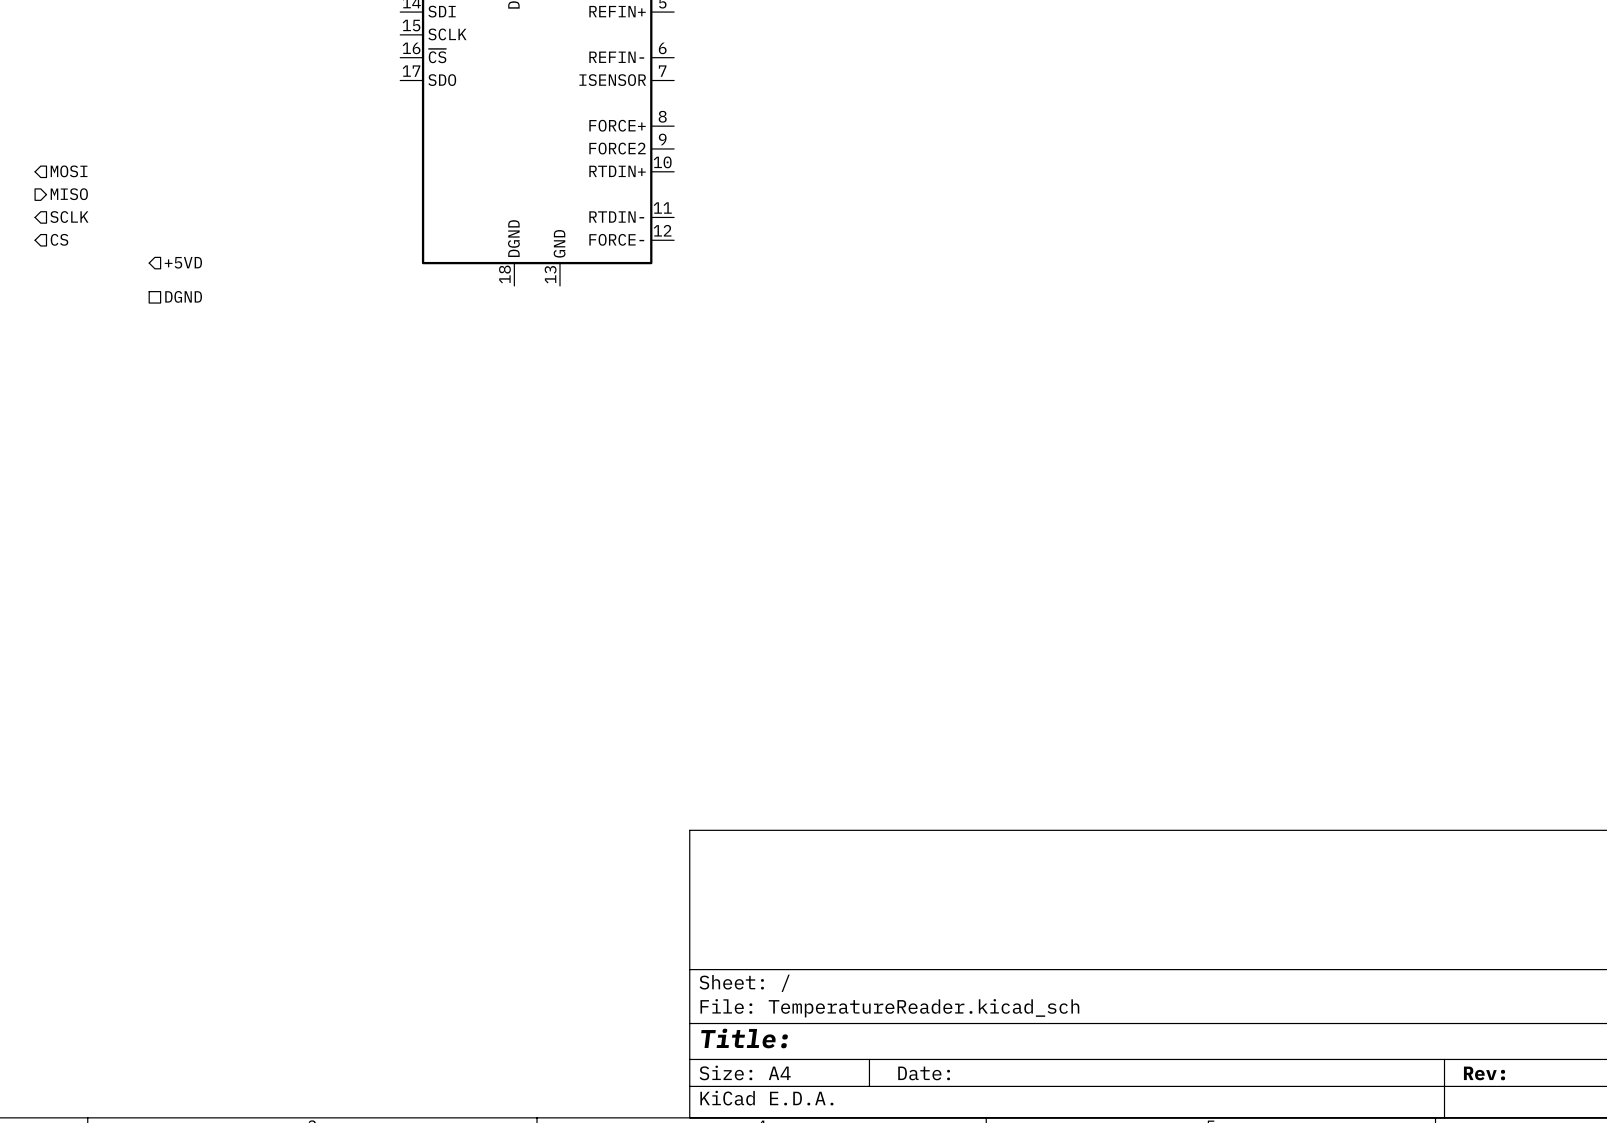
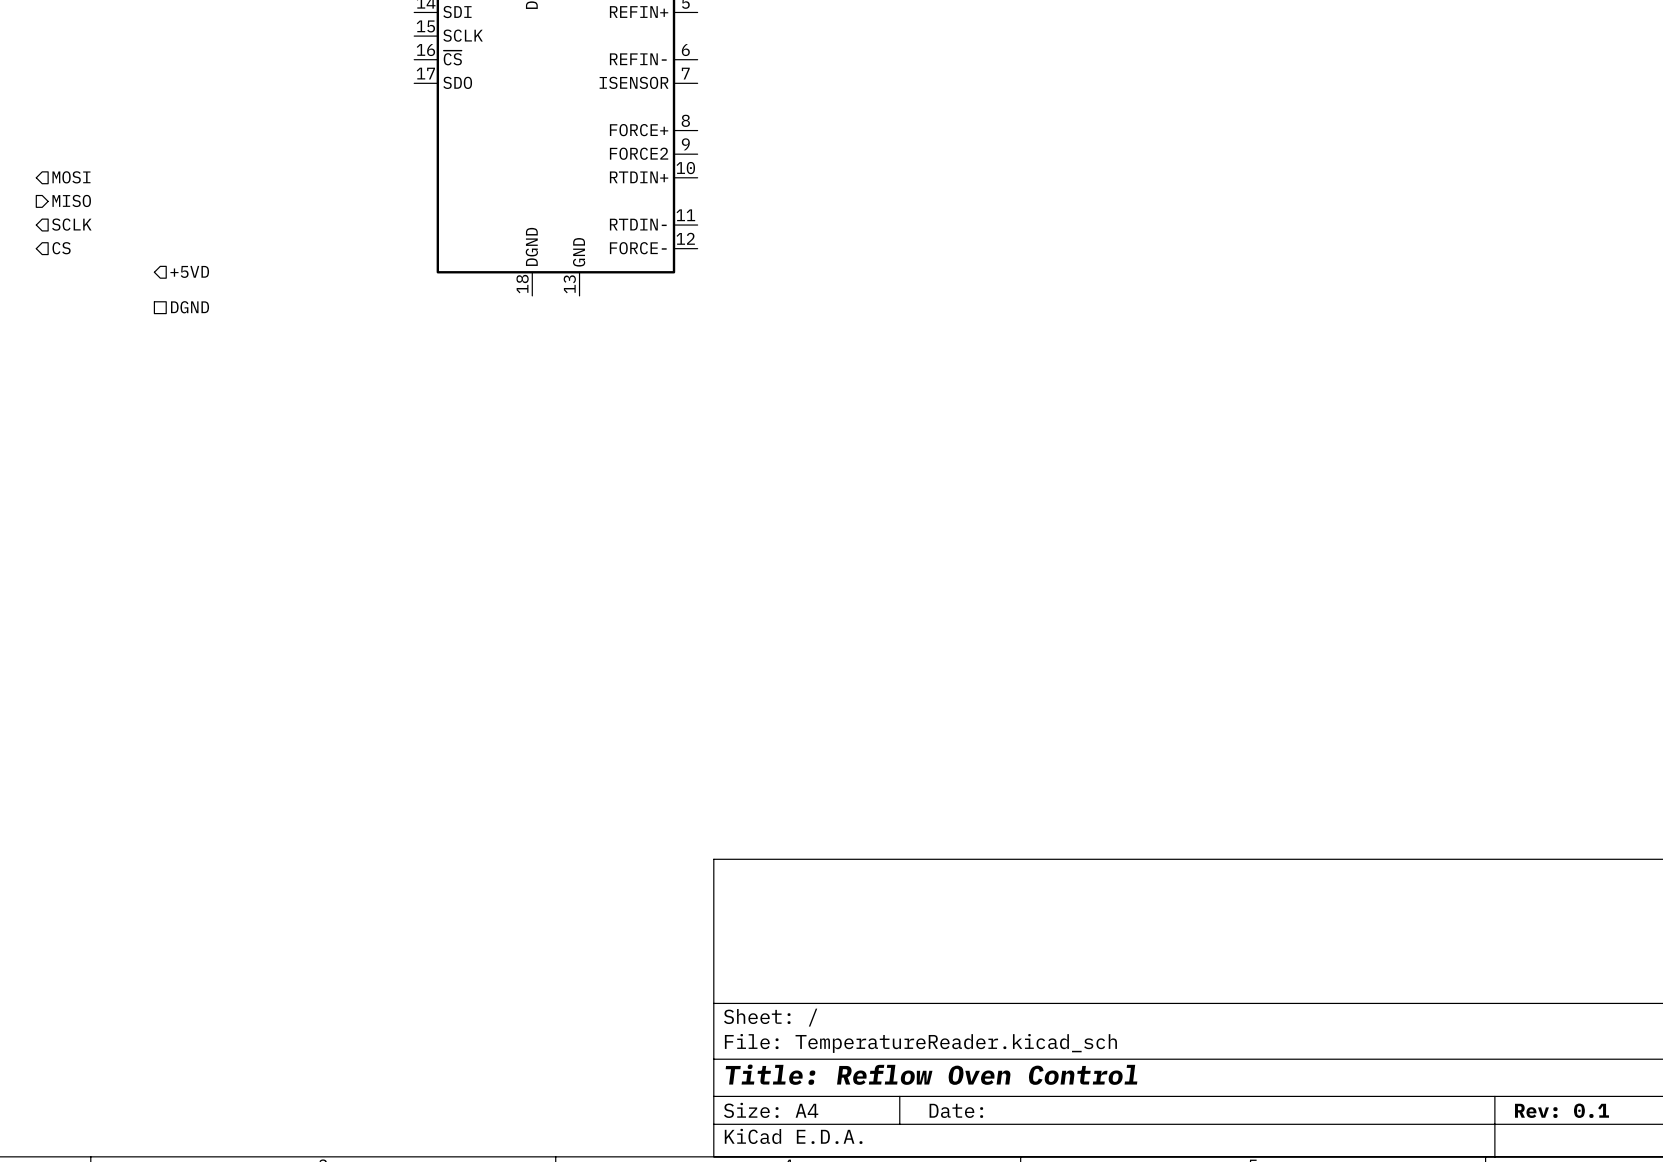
title block: Title: (744, 1038) -> Title: Reflow Oven Control (931, 1074)
title block: Rev: (1484, 1073) -> Rev: 0.1 (1562, 1110)

